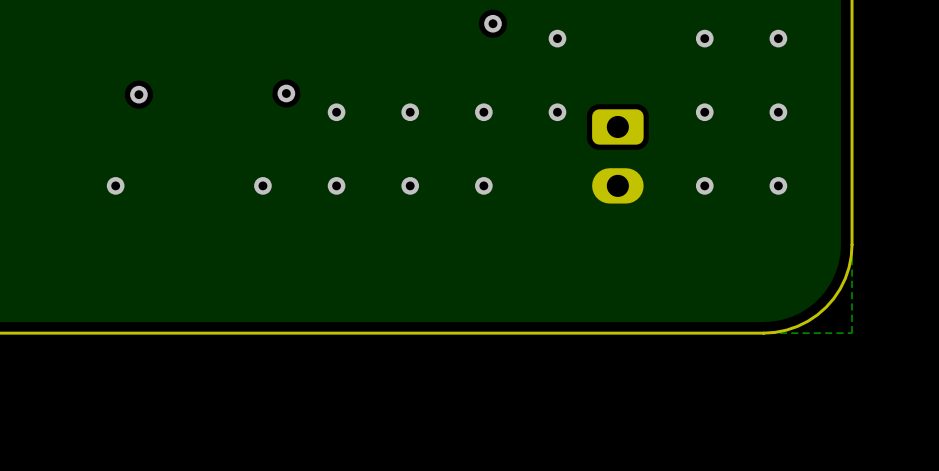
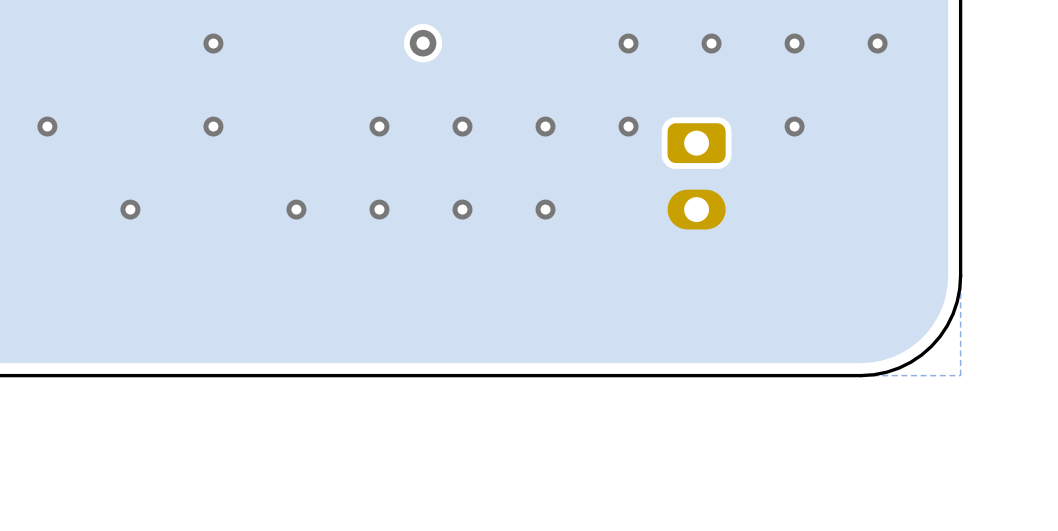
via: (492, 23) -> none
via: none -> (213, 43)
via: none -> (423, 43)
via: none -> (711, 43)
via: (286, 93) -> none
via: (138, 94) -> none
via: none -> (47, 126)
via: none -> (213, 126)
via: (778, 112) -> none
via: (704, 185) -> none
via: (778, 185) -> none

